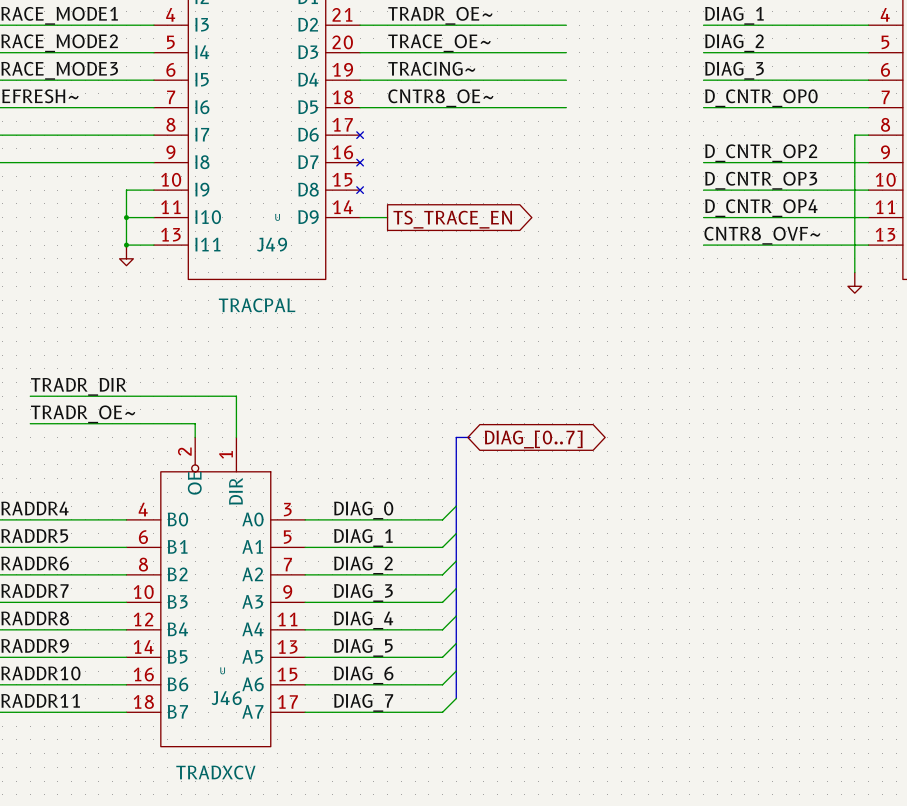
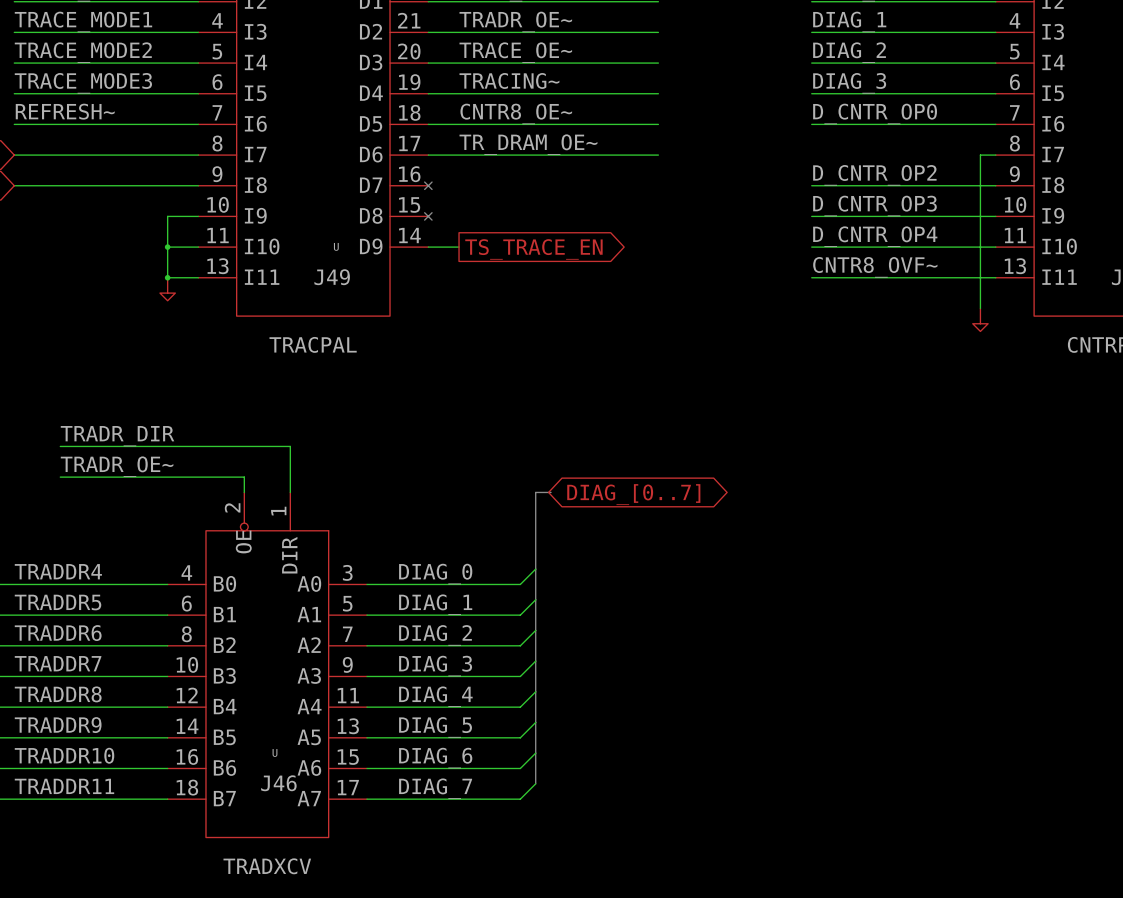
label: none -> TR_DRAM_OE~ (528, 144)
wire: none -> (428, 155) (658, 155)
no-connect mark: (360, 135) -> none

